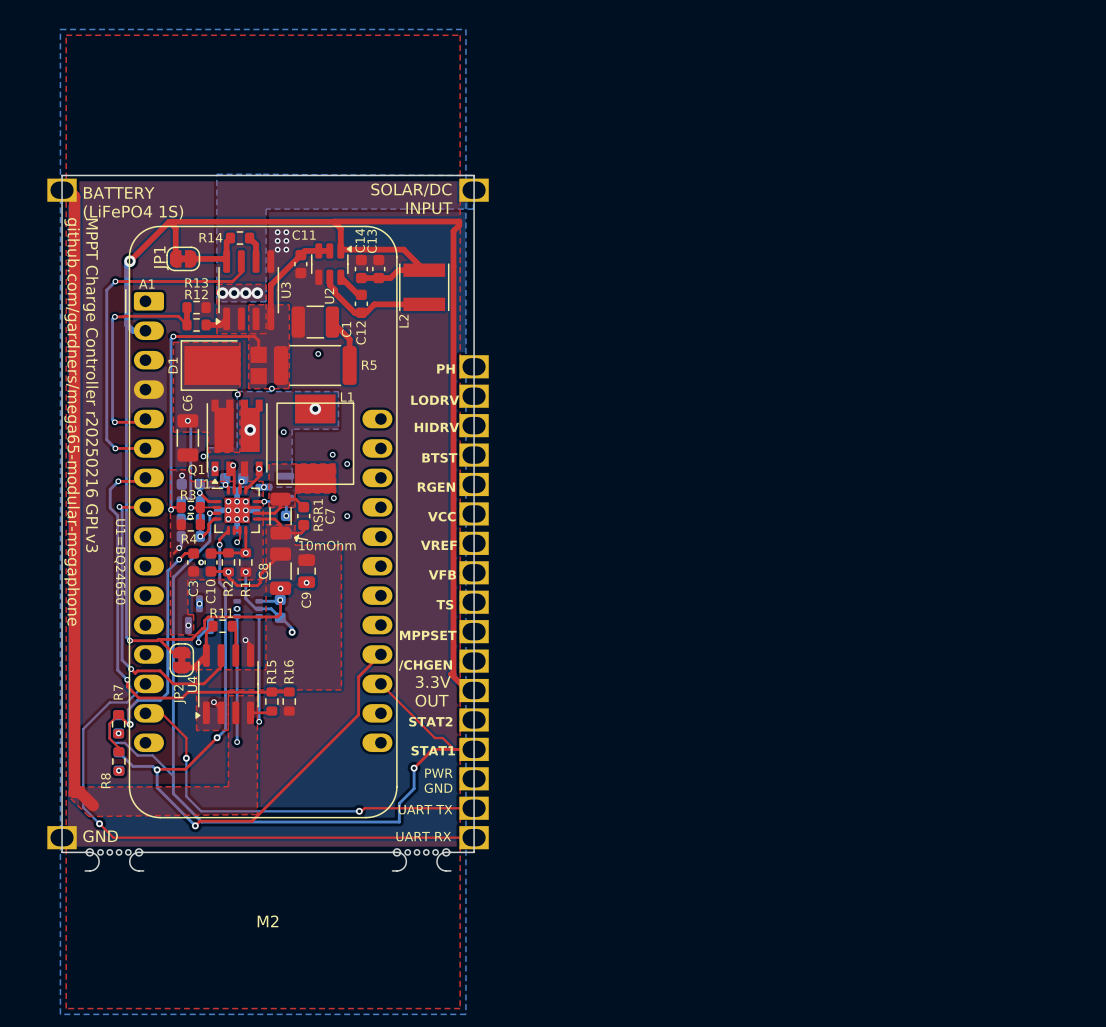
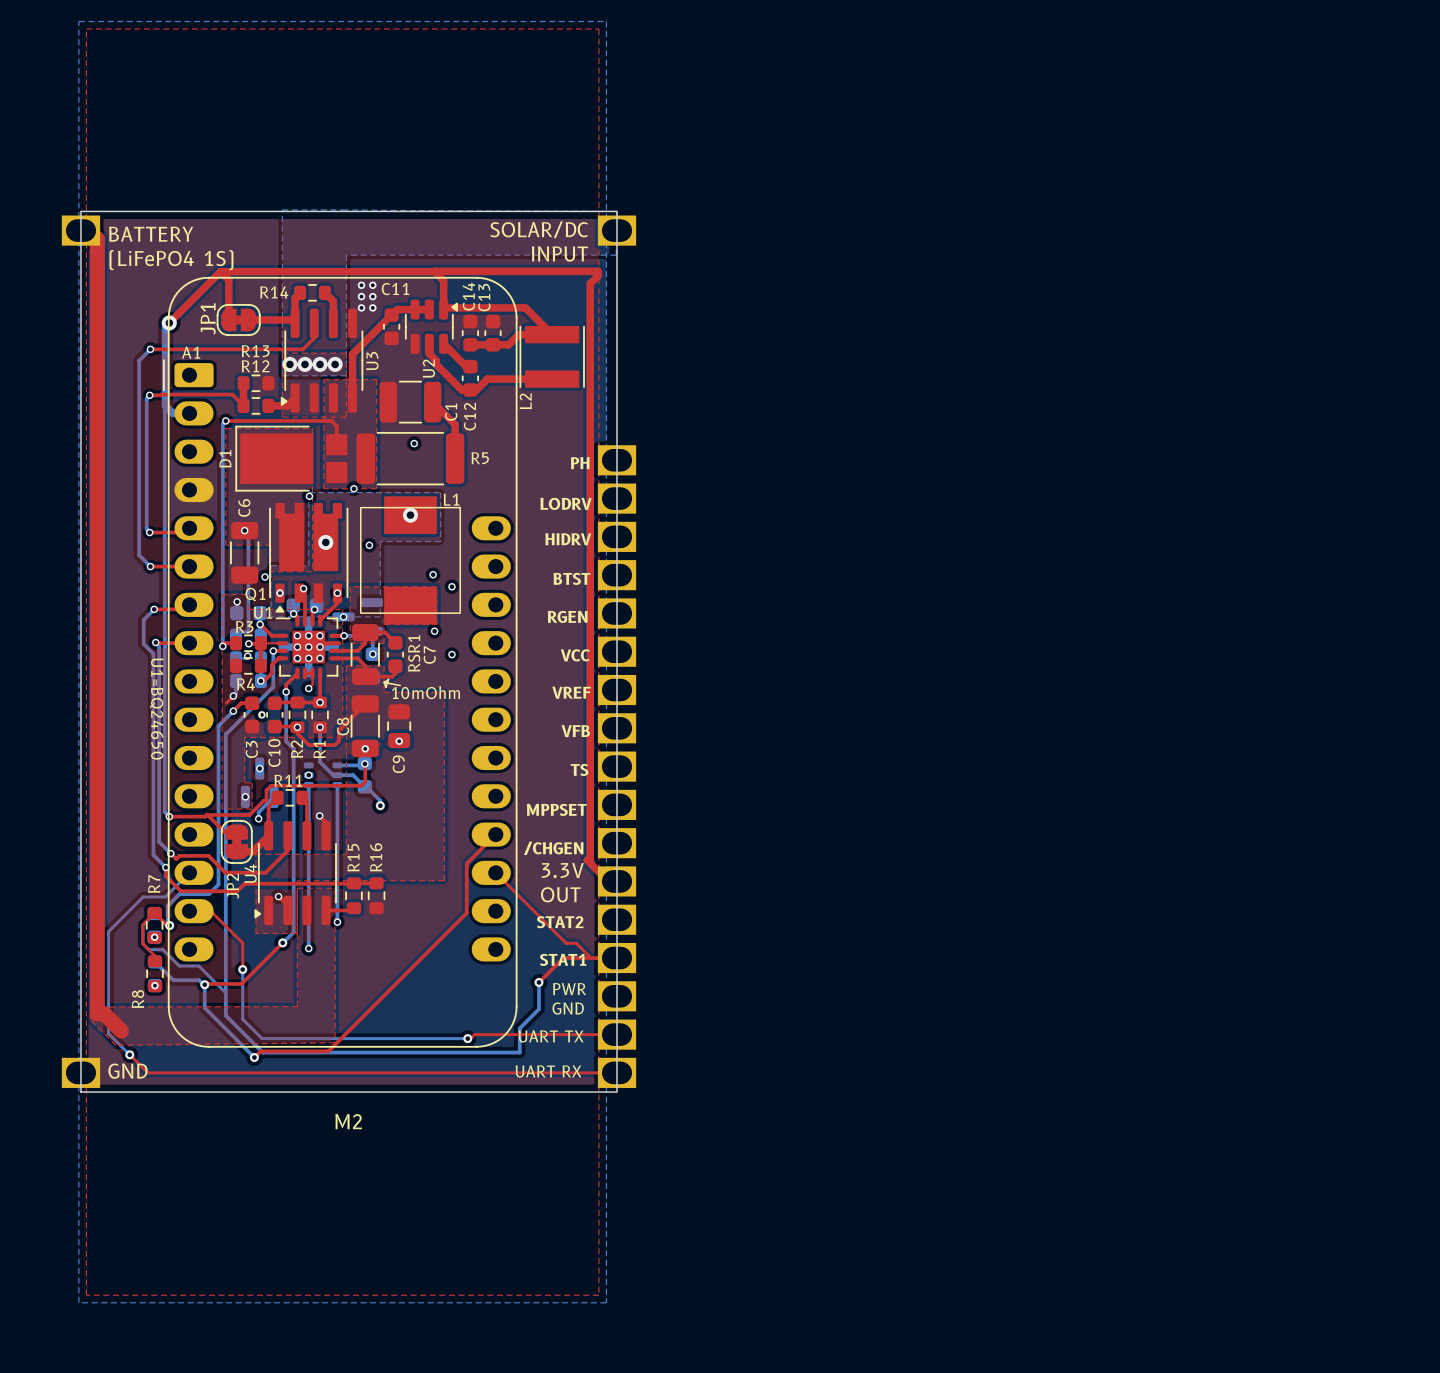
M2 footprint: [47, 175, 489, 872] -> [61, 210, 637, 1093]
text: MPPT Charge Controller r20250216 GPLv3 (90, 385) -> none
text: github.com/gardners/mega65-modular-megaphone (72, 421) -> none
M2 name position: M2 (268, 921) -> M2 (348, 1121)

